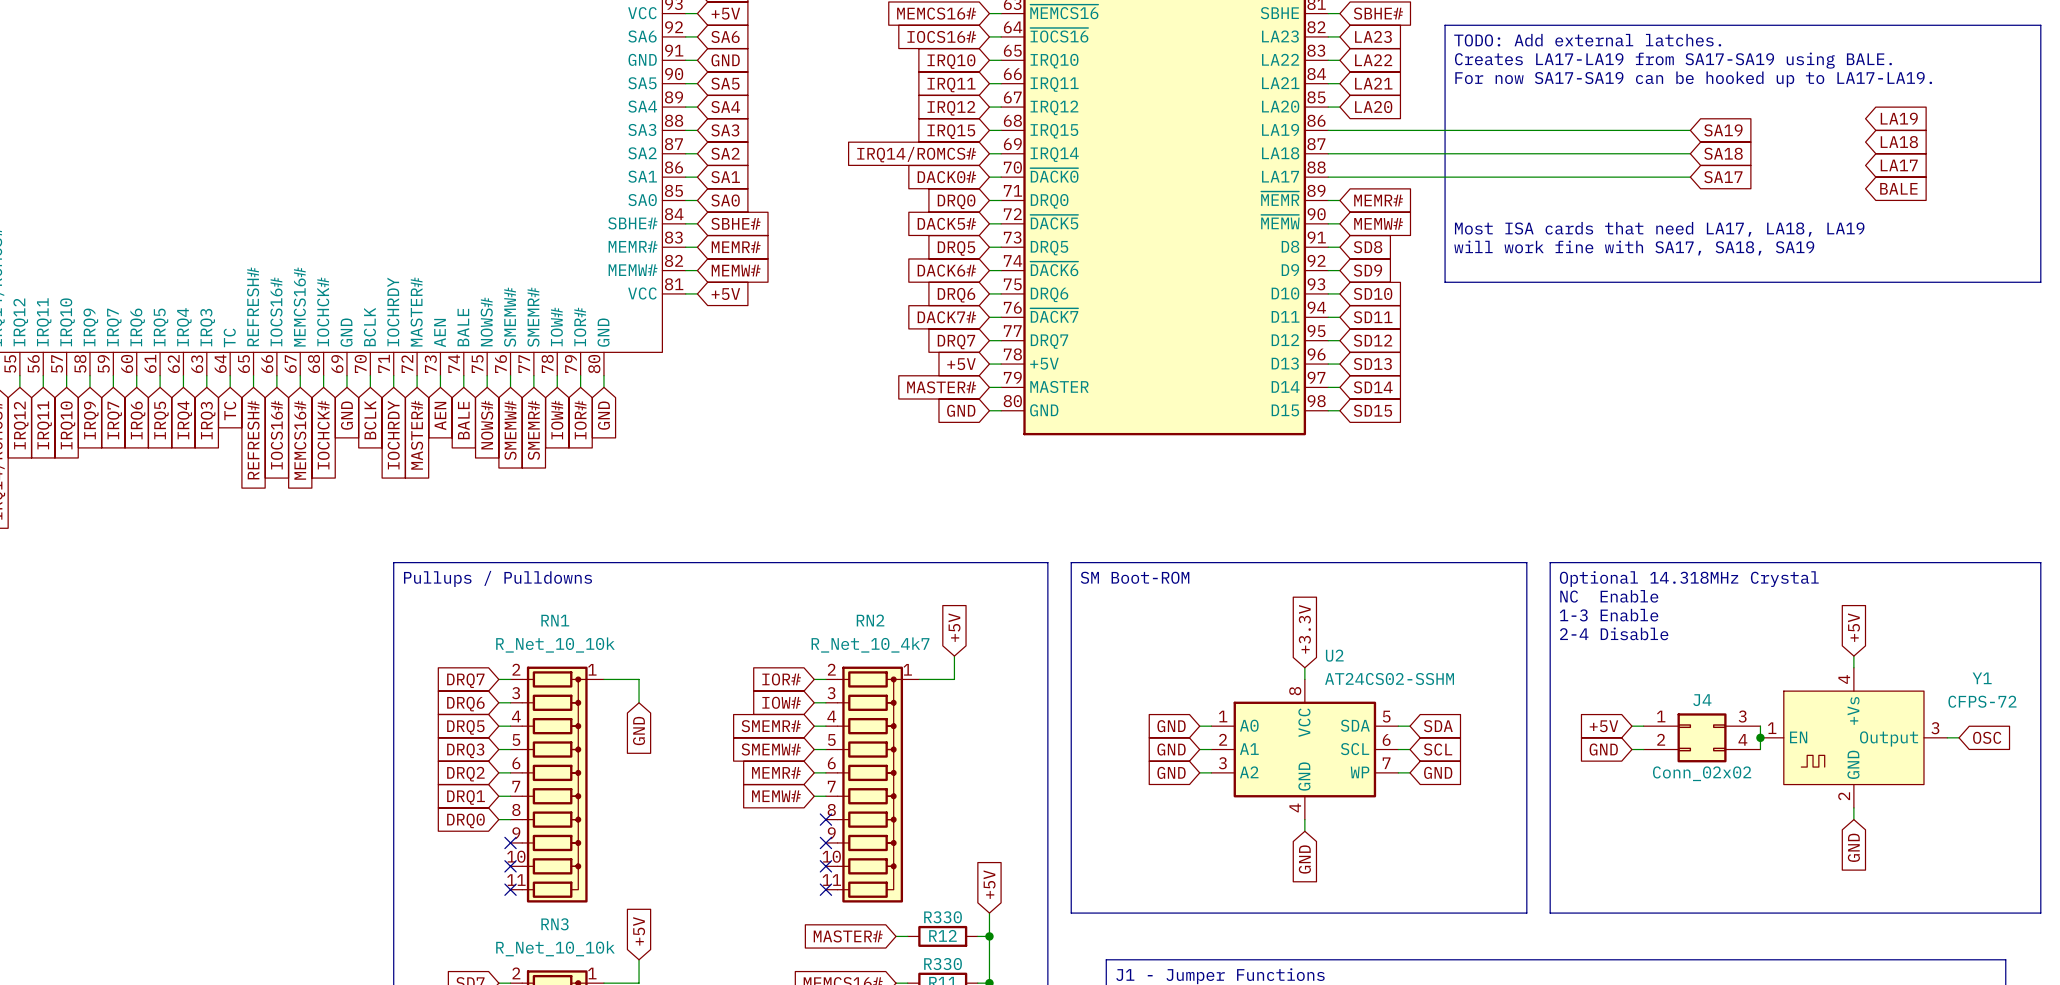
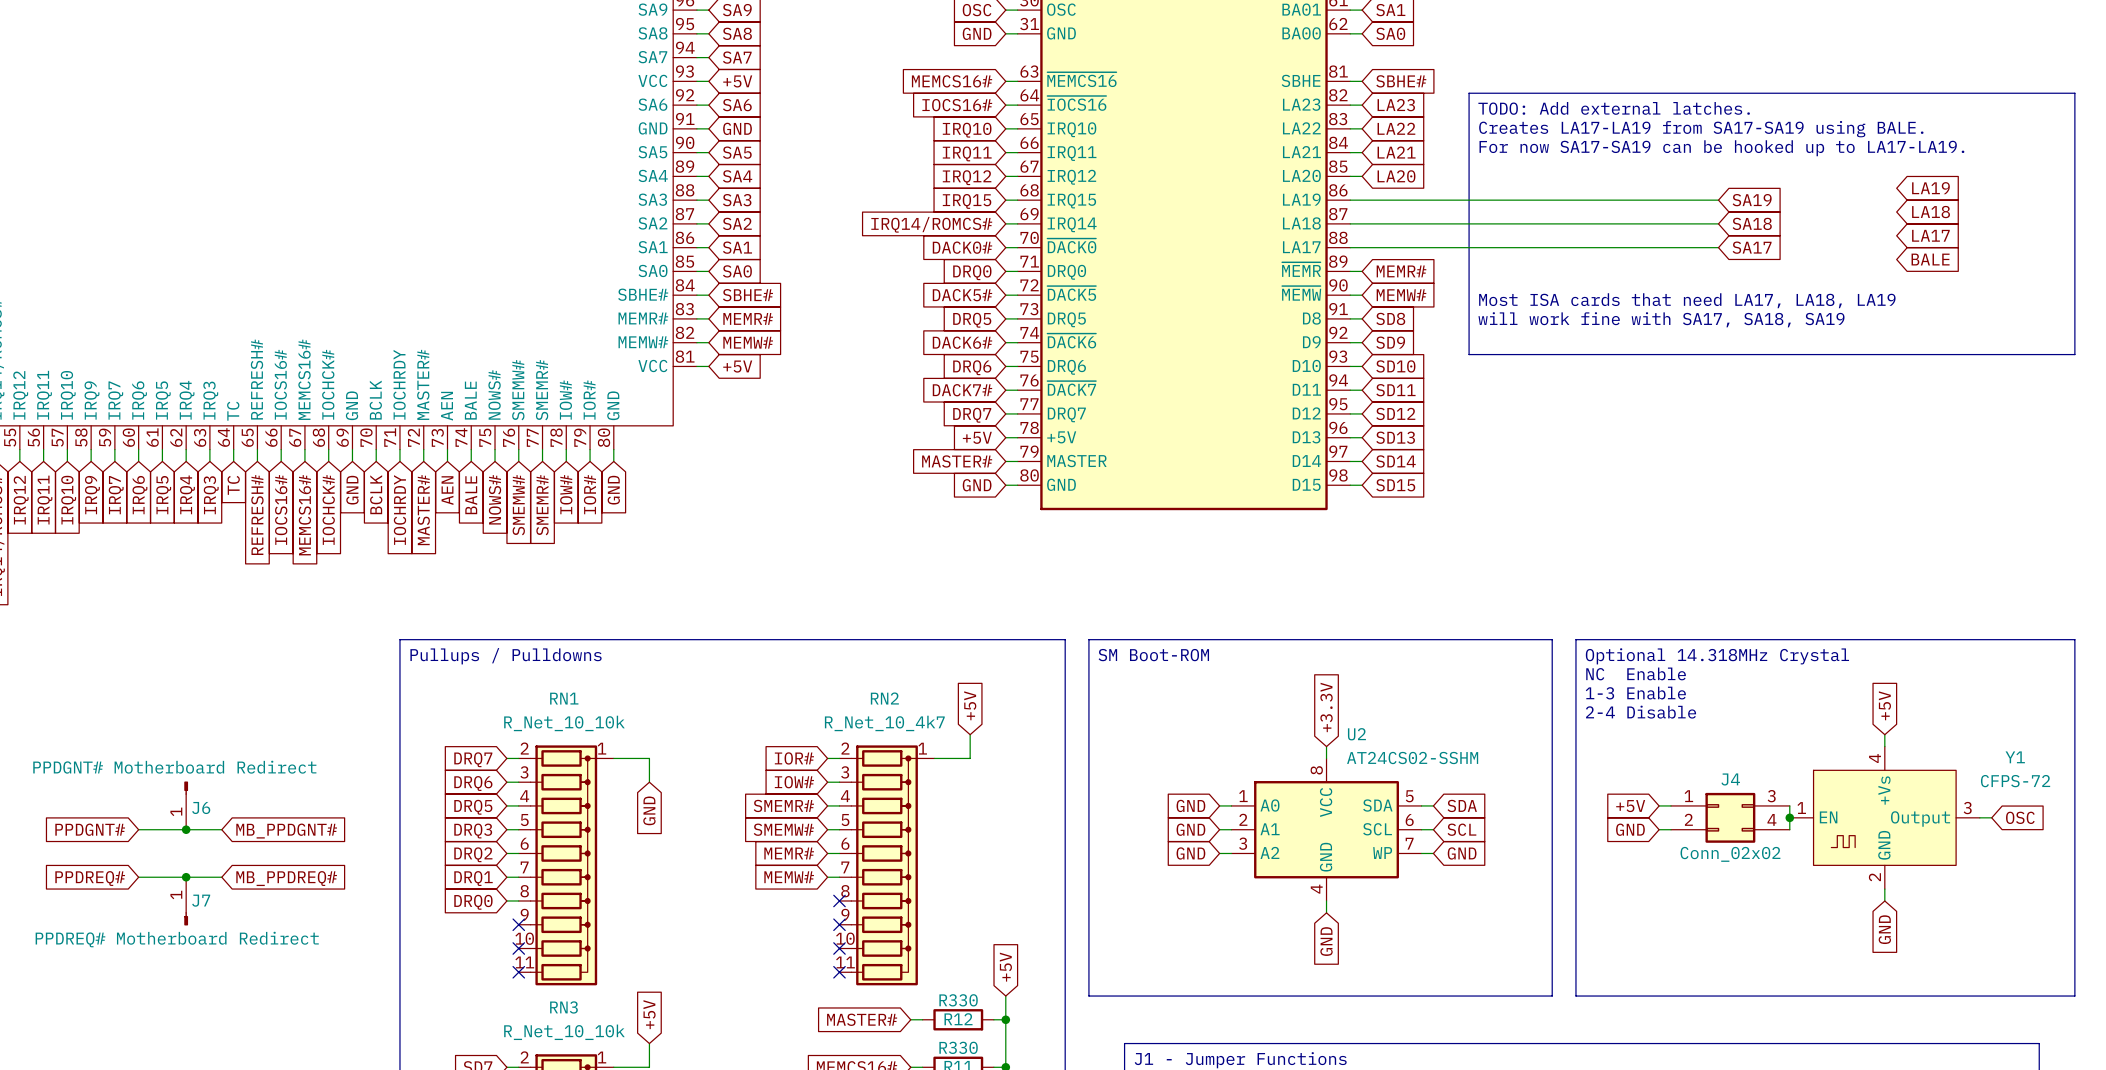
J6: none -> PPDGNT# Motherboard Redirect (186, 805)
global label: none -> PPDGNT# (90, 829)
wire: none -> (138, 829) (221, 829)
junction: none -> (186, 829)
global label: none -> MB_PPDGNT# (286, 831)
wire: none -> (138, 877) (221, 877)
junction: none -> (186, 877)
global label: none -> PPDREQ# (90, 878)
global label: none -> MB_PPDREQ# (286, 878)
J7: none -> PPDREQ# Motherboard Redirect (186, 901)

